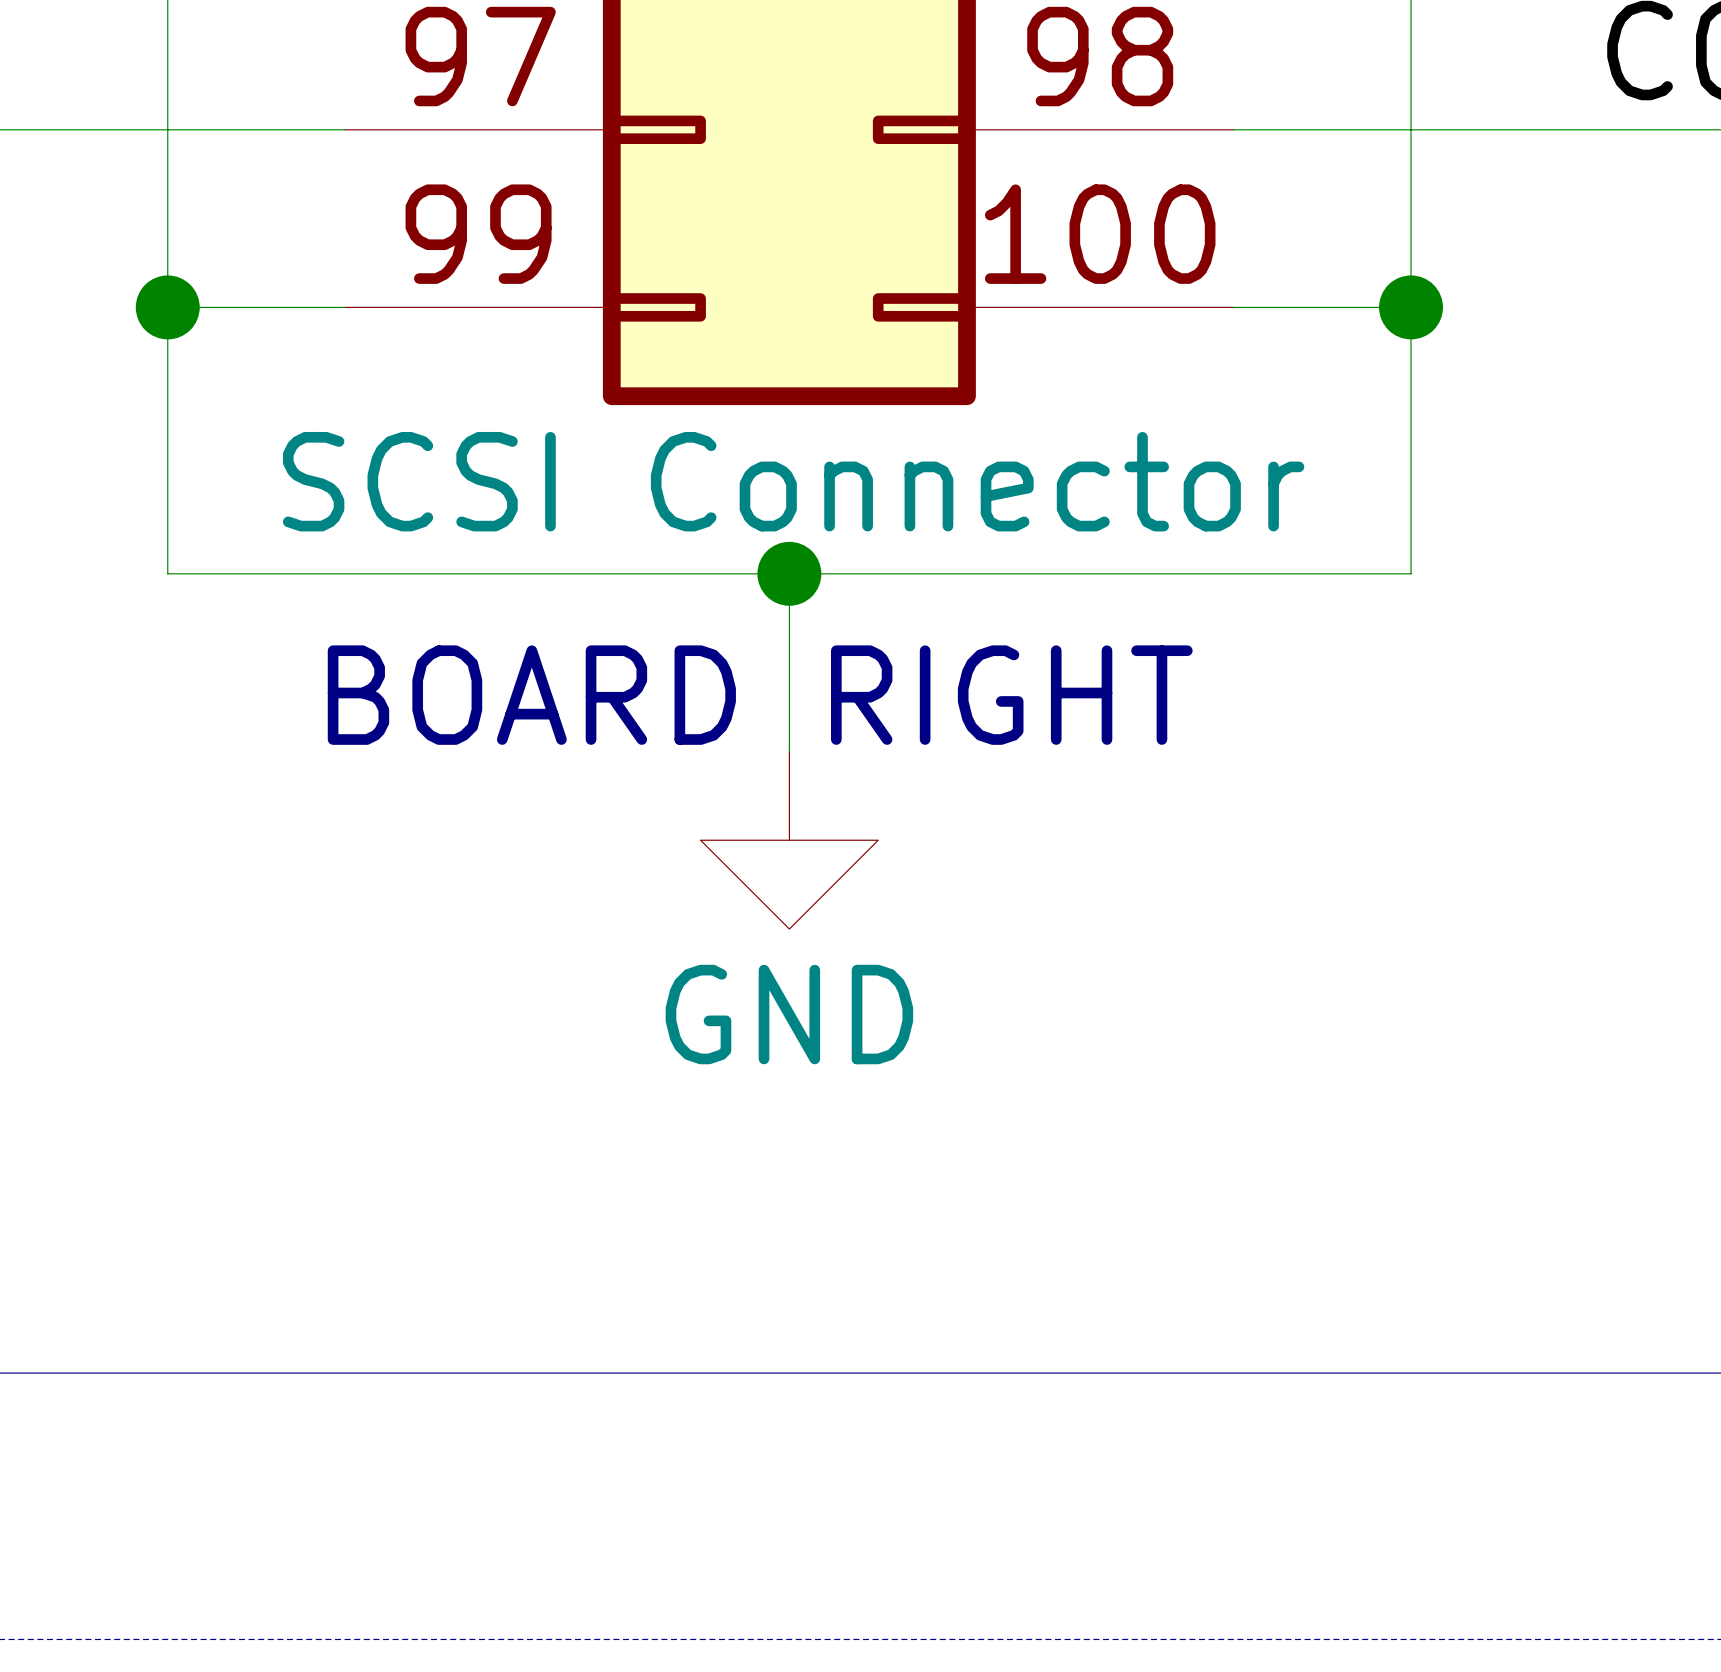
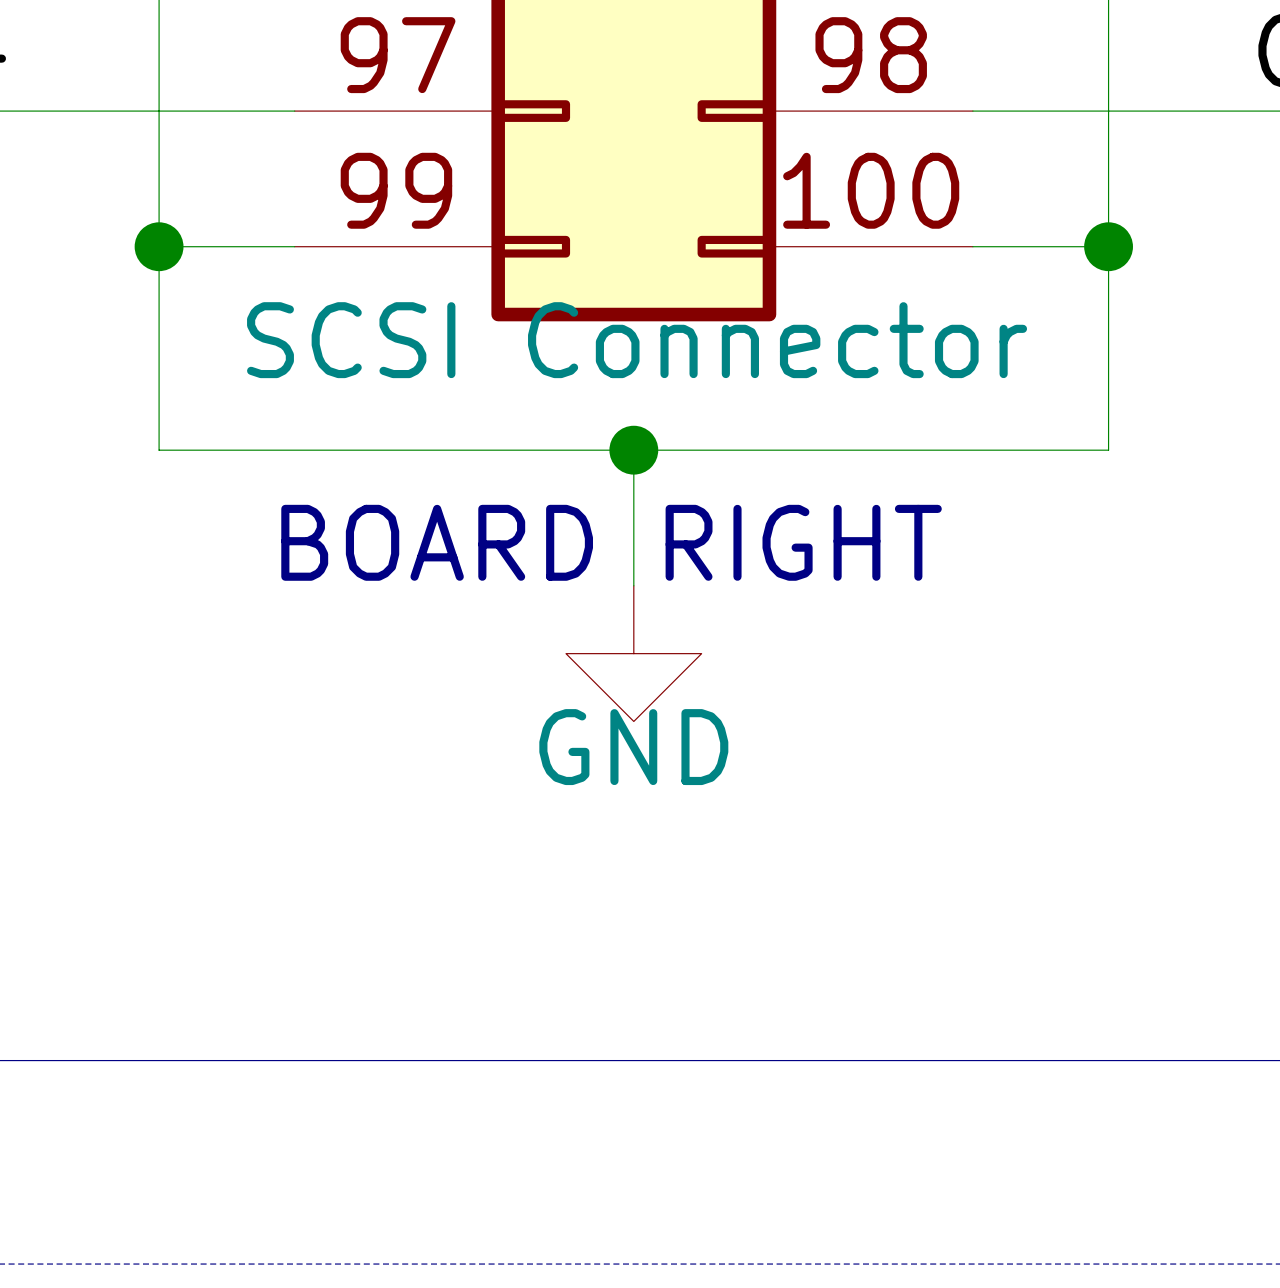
part value position: SCSI Connector (793, 481) -> SCSI Connector (637, 340)
power symbol text position: GND (789, 1014) -> GND (633, 747)

